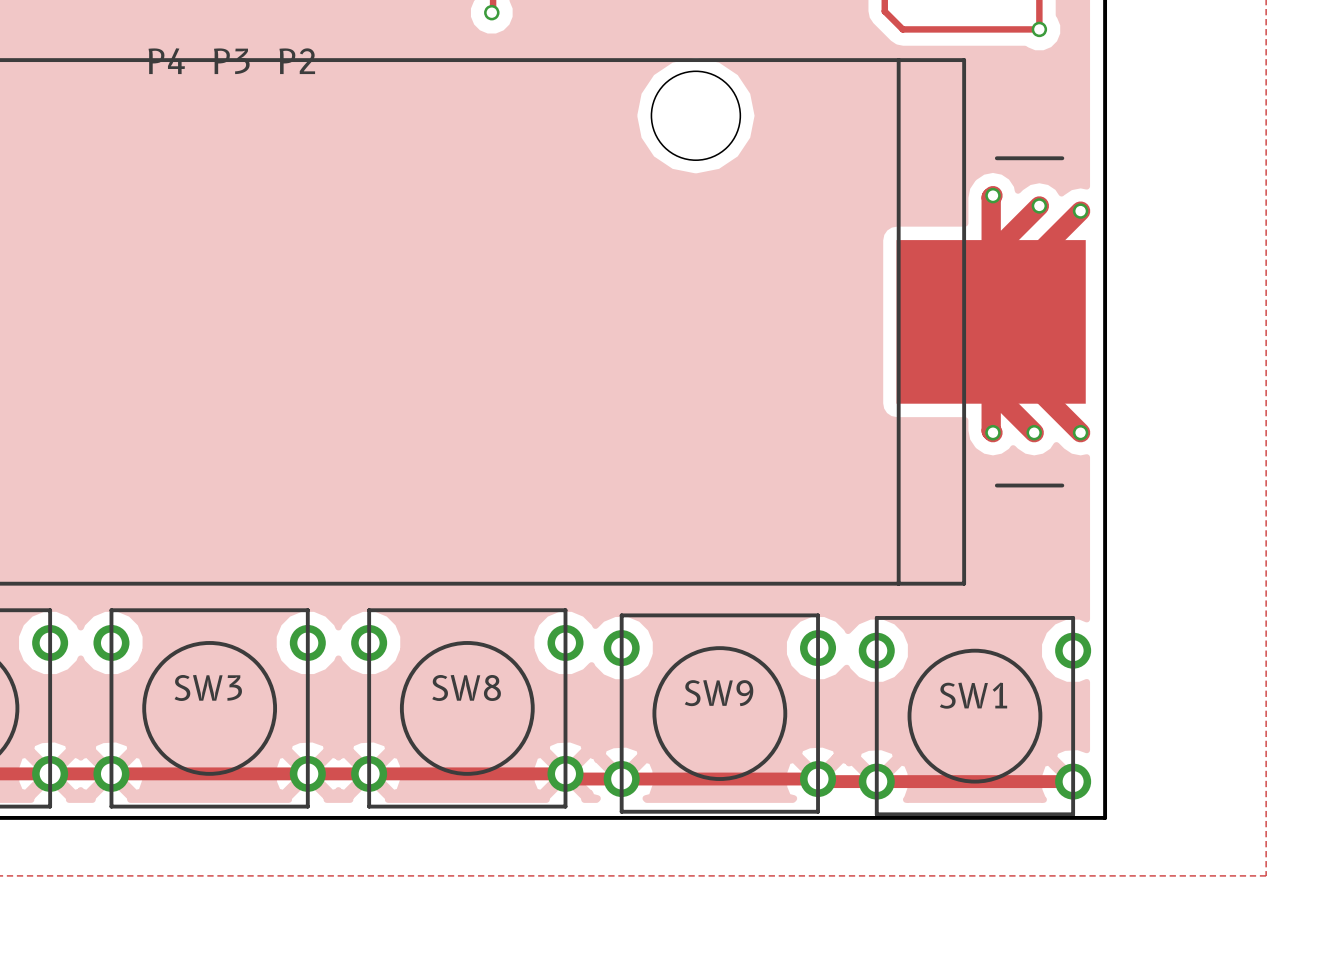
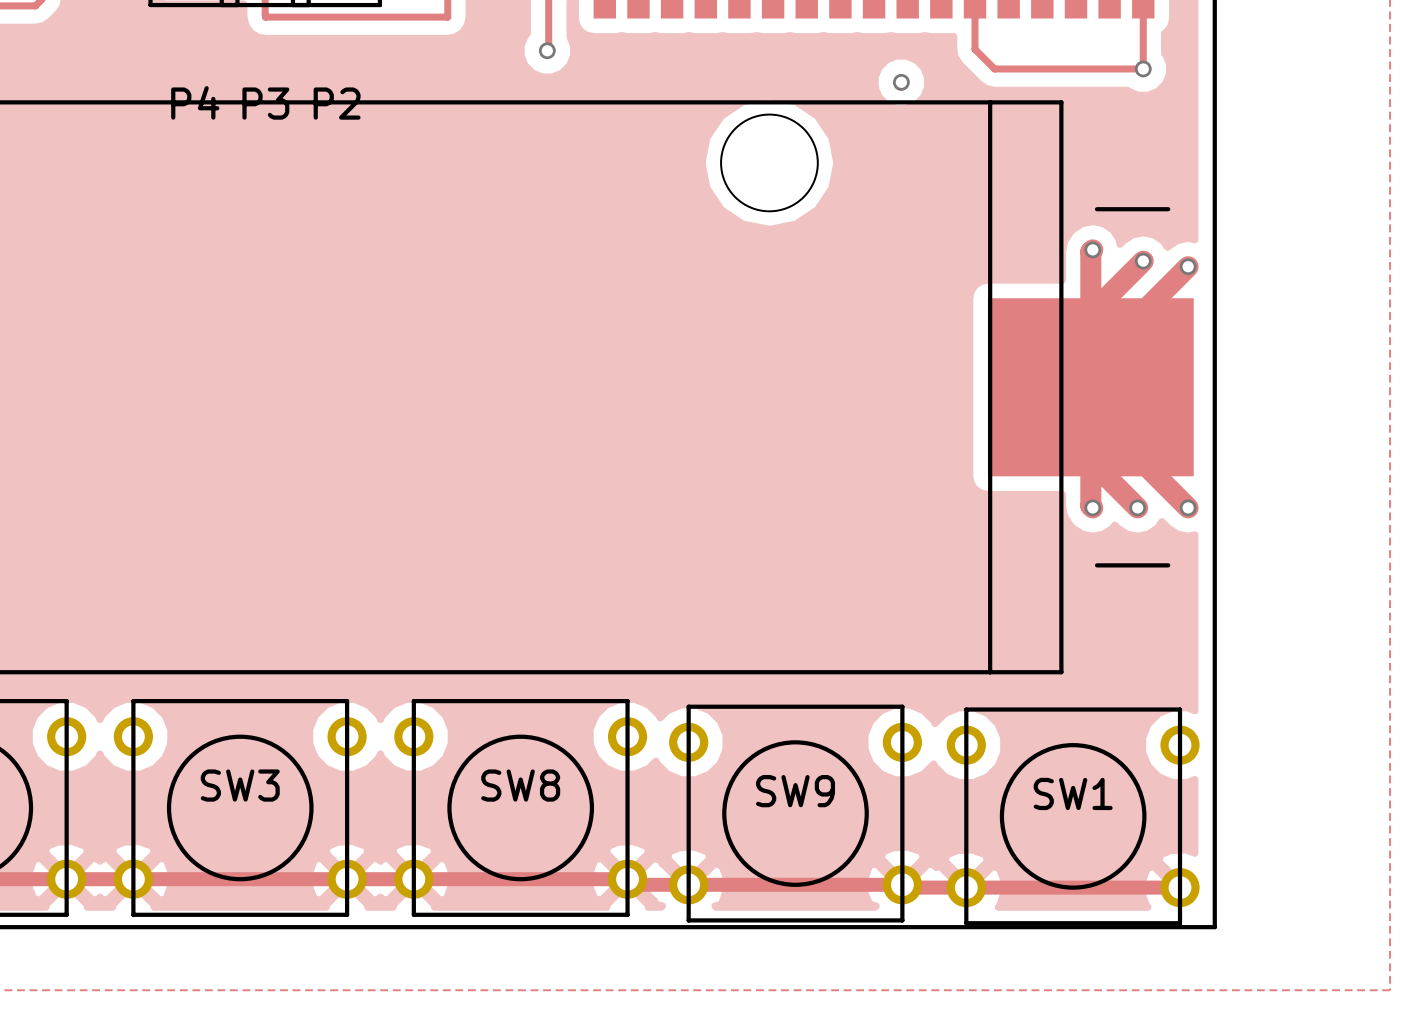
via: none -> (901, 82)

